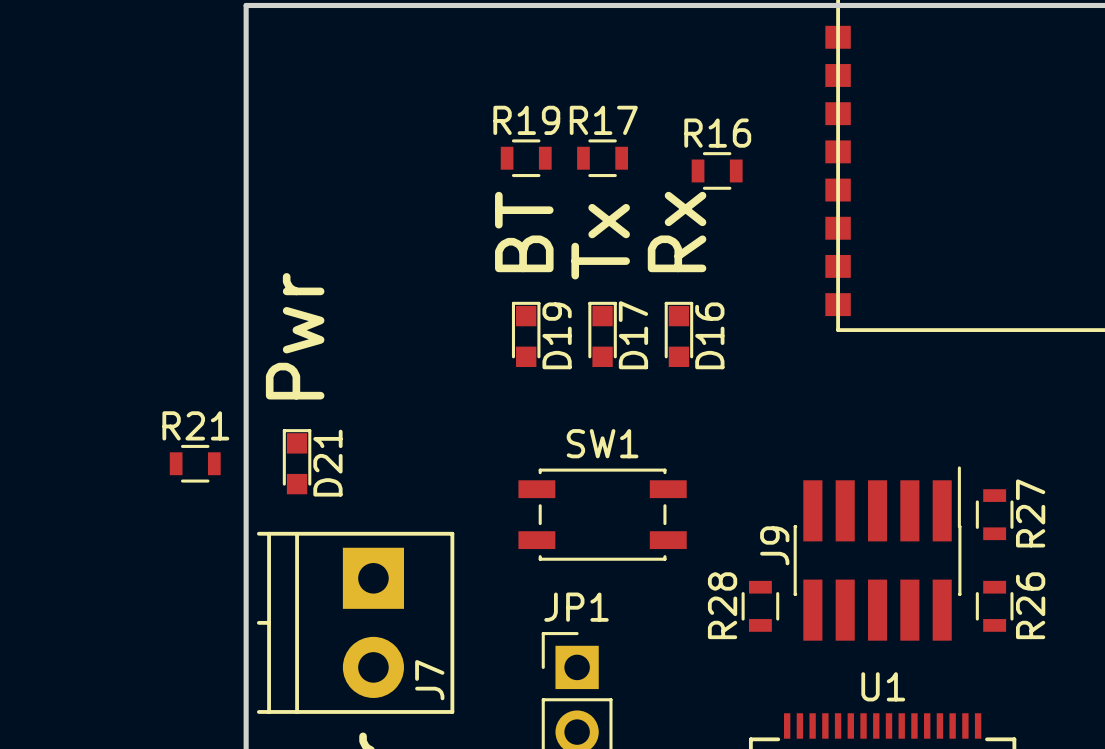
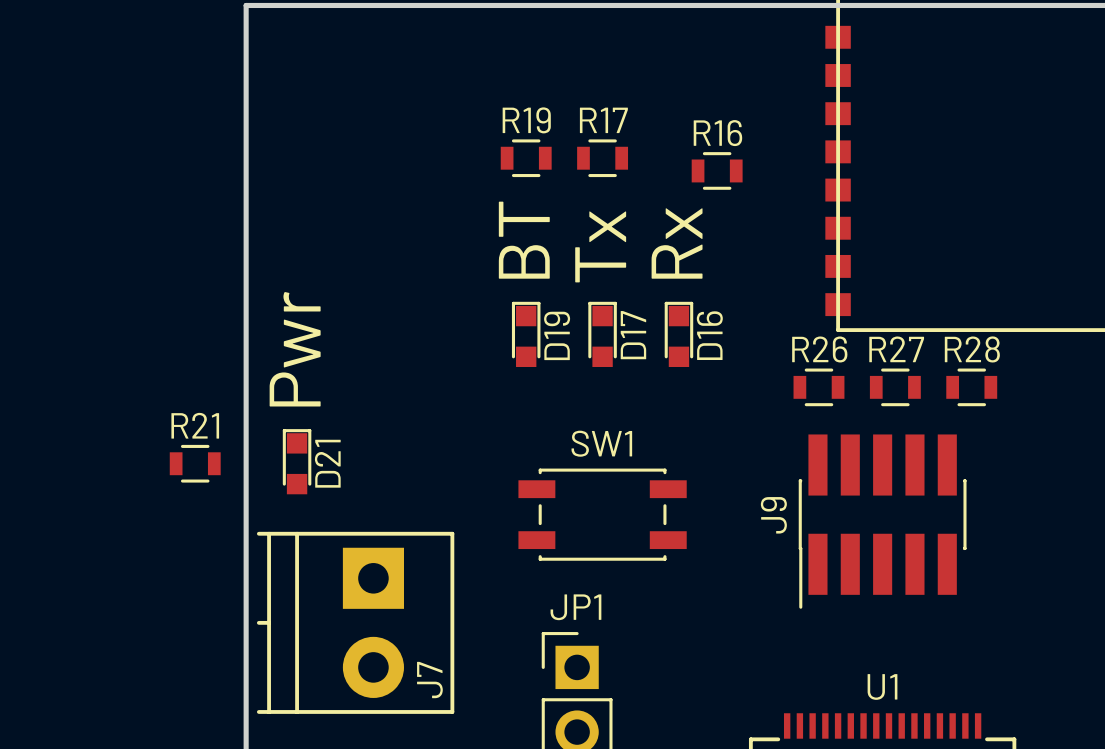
R27 name position: R27 (1030, 513) -> R27 (896, 349)
R27 rotation: 0° (994, 514) -> 90° clockwise (895, 387)
R27 position: (994, 514) -> (895, 387)
J9 rotation: 0° (877, 553) -> 180° (882, 521)
R26 name position: R26 (1030, 605) -> R26 (819, 349)
R28 rotation: 0° (760, 606) -> 90° clockwise (971, 387)
R28 position: (760, 606) -> (971, 387)
R26 rotation: 0° (994, 606) -> 90° clockwise (818, 387)
R26 position: (994, 606) -> (818, 387)

